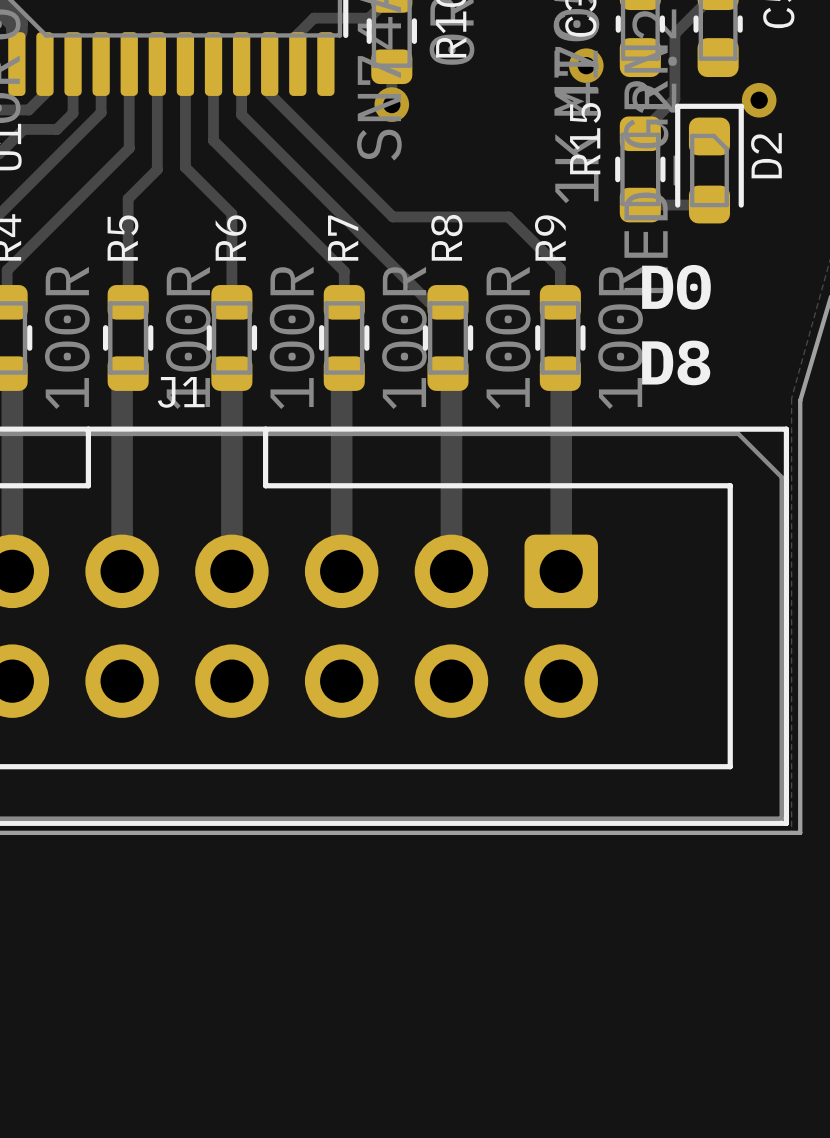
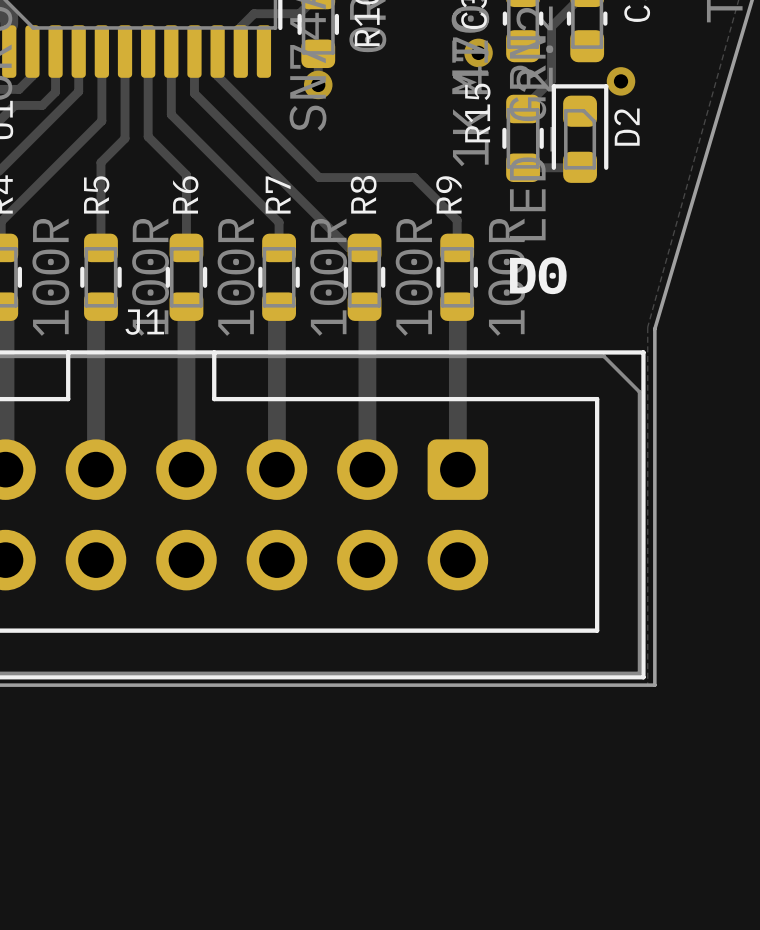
text position: D0 (676, 287) -> D0 (538, 275)
text: D8 (676, 362) -> none

